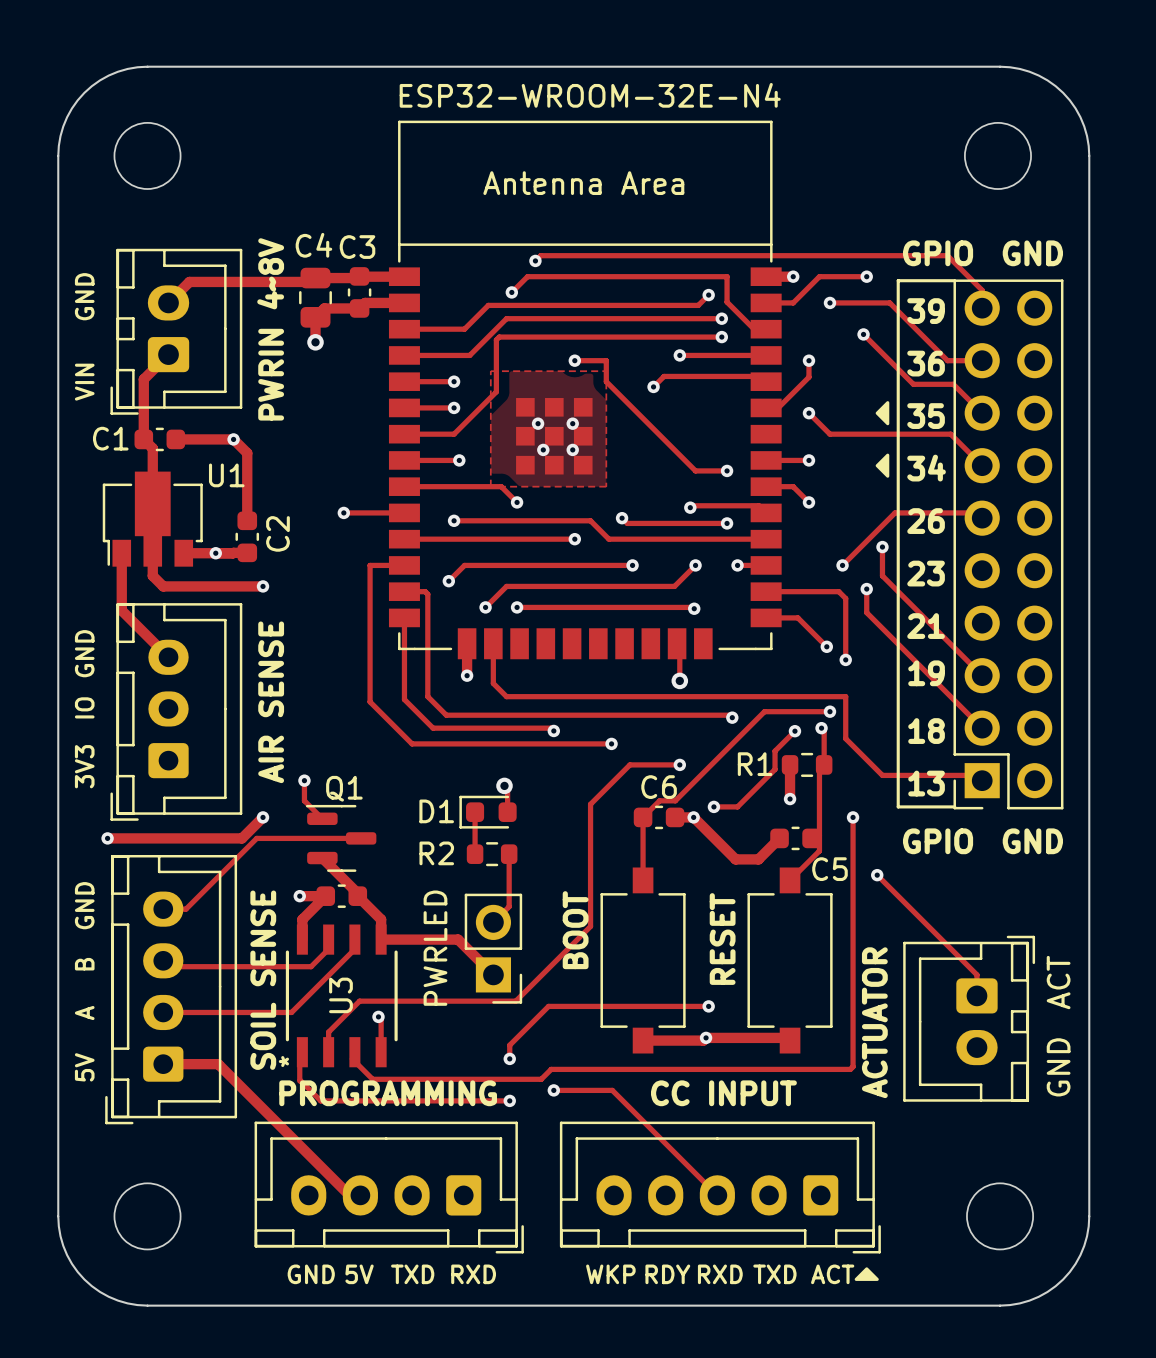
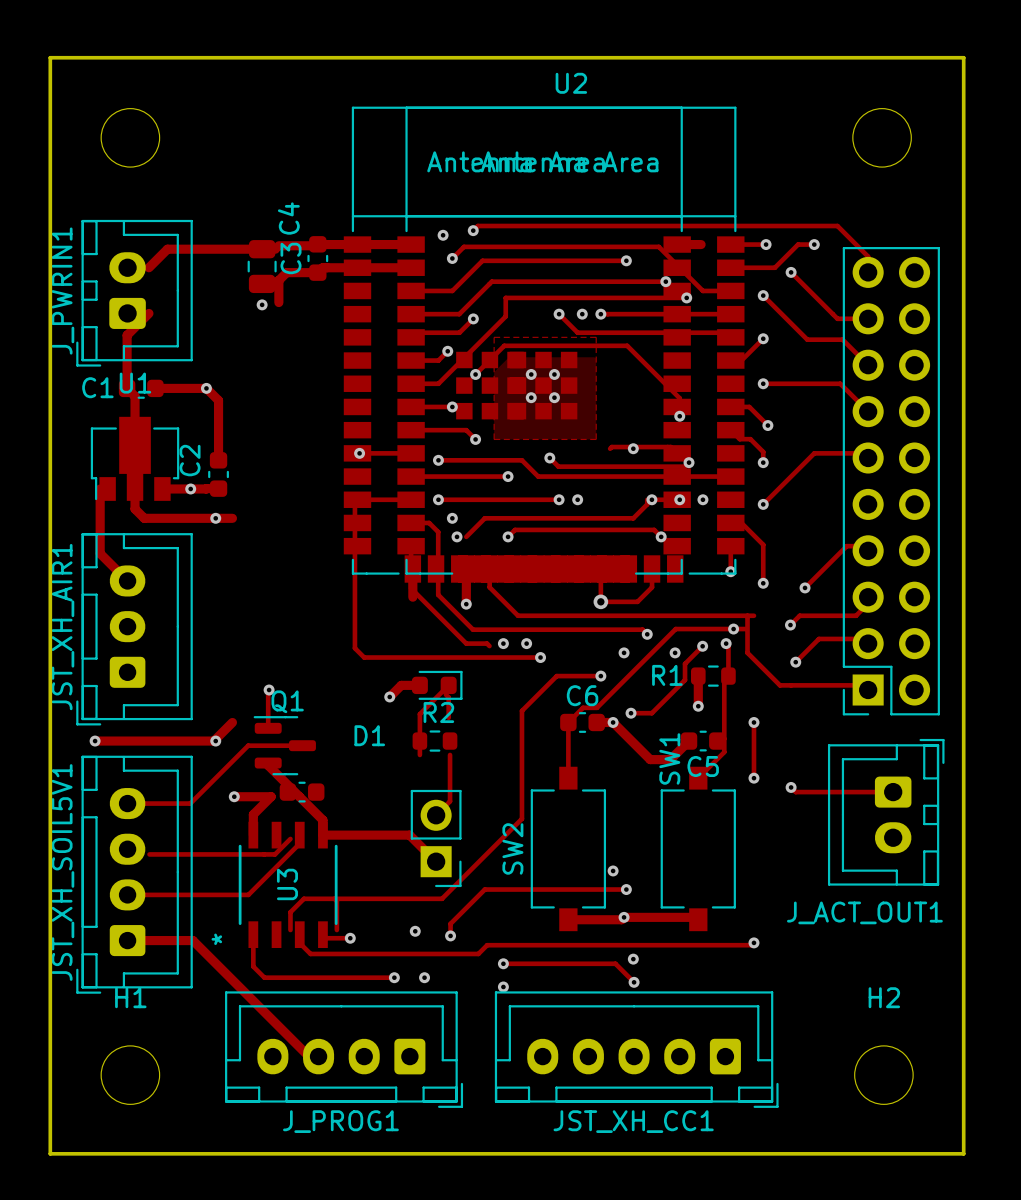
board edge: (147, 66) (1000, 66) (1019, 68) (1038, 75) (1055, 86) (1069, 100) (1084, 126) (1089, 155) (1089, 1216) (1087, 1236) (1080, 1255) (1069, 1272) (1055, 1286) (1029, 1300) (1000, 1305) (147, 1305) (127, 1303) (108, 1296) (91, 1286) (77, 1272) (63, 1245) (58, 1216) (58, 145) (67, 117) (77, 100) (91, 86) (118, 71) (147, 66) -> (50, 57) (50, 1153) (963, 1153) (963, 57) (50, 57)
text: ESP32-WROOM-32E-N4 (590, 95) -> none
C4 name rotation: 0° (313, 245) -> 90° counterclockwise (288, 218)
C3 name rotation: 0° (357, 247) -> 90° counterclockwise (291, 258)
C3 name position: C3 (357, 247) -> C3 (291, 258)
text: GPIO (938, 253) -> none
text: GND (1032, 253) -> none
via: none -> (443, 235)
via: (793, 276) -> none
track: (826, 276) (819, 276) (793, 302) (766, 302) -> none
via: none -> (814, 244)
track: (524, 279) (527, 276) (727, 276) (727, 302) (754, 329) -> (463, 246) (658, 246) (702, 290) (730, 290)
line: (954, 280) (898, 280) (898, 806) (954, 806) -> none
track: (708, 295) (698, 305) (488, 305) (464, 329) (404, 329) -> (626, 260) (482, 260) (452, 290) (411, 290)
text: GND (84, 296) -> none
C4 position: (315, 297) -> (262, 266)
via: (829, 302) -> none
track: (876, 302) (889, 302) (895, 308) -> (774, 267) (798, 244) (814, 244)
via: none -> (791, 272)
text: 39 (926, 311) -> none
track: (556, 318) (506, 318) (469, 355) -> (491, 281) (459, 314) (415, 314)
track: none -> (637, 281) (665, 281)
via: (721, 318) -> none
via: none -> (665, 281)
text: PWRIN 4~8V (270, 329) -> none
J_PWRIN1: none -> (134, 293)
part: (176, 331) -> none
track: (572, 337) (499, 337) (496, 340) (496, 391) (454, 434) (404, 434) -> (505, 297) (505, 316) (438, 383) (411, 383)
via: (721, 337) -> none
via: none -> (686, 297)
via: (315, 342) -> none
via: none -> (262, 304)
track: (404, 355) (465, 355) -> (357, 267) (411, 267)
via: none -> (559, 314)
via: none -> (582, 314)
track: none -> (473, 318) (459, 332) (415, 332) (411, 337)
via: none -> (473, 318)
track: (574, 360) (606, 360) (606, 381) (695, 470) (727, 470) -> none
via: (574, 360) -> none
track: (808, 360) (808, 377) (778, 407) -> none
via: (808, 360) -> none
text: 36 (926, 363) -> none
zone outline: (490, 371) (606, 371) (606, 486) (490, 486) (490, 371) -> (494, 337) (596, 337) (596, 439) (494, 439) (494, 337)
track: (664, 376) (653, 386) -> (586, 332) (577, 332) (559, 314)
track: none -> (672, 332) (726, 332) (730, 337)
track: (404, 381) (454, 381) -> none
via: (454, 381) -> none
text: VIN (84, 382) -> none
track: none -> (763, 338) (741, 360) (730, 360)
via: none -> (763, 338)
via: (653, 386) -> none
U2: none -> (570, 344)
track: none -> (447, 351) (438, 360) (411, 360)
via: none -> (447, 351)
drawing: [875, 401, 890, 426] -> none
track: (404, 407) (454, 407) -> none
via: (454, 407) -> none
track: (808, 413) (829, 434) (863, 434) -> none
via: (808, 413) -> none
text: 35 (926, 416) -> none
track: none -> (475, 374) (504, 345) (627, 345) (679, 398) (679, 416)
via: (572, 423) -> none
via: none -> (531, 374)
via: none -> (554, 374)
via: none -> (763, 383)
via: (543, 449) -> none
via: (572, 449) -> none
via: none -> (531, 397)
via: none -> (554, 397)
drawing: [875, 453, 890, 478] -> none
track: (404, 460) (459, 460) -> (637, 297) (686, 297)
via: (459, 460) -> none
track: none -> (411, 406) (452, 406)
via: none -> (452, 406)
track: (766, 460) (808, 460) -> none
via: (808, 460) -> none
track: none -> (730, 406) (749, 406) (767, 425)
text: 34 (926, 468) -> none
via: (727, 470) -> none
via: none -> (679, 416)
U1 name position: U1 (226, 475) -> U1 (135, 383)
via: none -> (767, 425)
track: (404, 486) (465, 486) -> (357, 244) (411, 244)
track: (501, 486) (517, 502) -> (443, 430) (466, 430) (475, 439)
track: (766, 486) (793, 486) (808, 502) -> none
track: none -> (730, 430) (739, 439) (750, 439) (763, 451) (763, 462)
via: none -> (475, 439)
via: (517, 502) -> none
via: (808, 502) -> none
via: (690, 507) -> none
via: none -> (633, 448)
track: (343, 512) (404, 512) -> none
via: (343, 512) -> none
track: none -> (359, 453) (411, 453)
via: none -> (359, 453)
track: (921, 512) (895, 512) (842, 565) -> (814, 453) (763, 504)
track: (454, 520) (496, 520) -> none
via: (454, 520) -> none
via: none -> (438, 460)
text: 26 (926, 521) -> none
track: (627, 523) (727, 523) -> (554, 462) (558, 466) (685, 466) (689, 462)
via: (727, 523) -> none
via: none -> (689, 462)
via: none -> (763, 462)
C2 name position: C2 (277, 533) -> C2 (190, 460)
track: (404, 539) (465, 539) -> (677, 314) (730, 314)
track: (882, 547) (882, 575) (982, 675) -> none
via: (882, 547) -> none
track: none -> (100, 488) (100, 553) (127, 580)
track: (121, 553) (121, 610) (168, 657) -> none
track: (401, 565) (370, 565) (370, 701) (401, 733) -> (354, 499) (354, 648)
track: (464, 565) (448, 581) -> (410, 499) (357, 499)
track: (465, 565) (496, 565) -> none
via: none -> (438, 499)
via: none -> (577, 499)
track: (695, 565) (674, 586) -> (647, 499) (647, 504) (633, 518) (596, 518)
via: (695, 565) -> none
via: none -> (679, 499)
via: none -> (702, 499)
via: (842, 565) -> none
via: none -> (763, 504)
text: 23 (926, 573) -> none
via: (448, 581) -> none
via position: (263, 586) -> (215, 518)
via: none -> (452, 518)
track: (548, 586) (506, 586) (485, 607) -> (484, 518) (466, 536)
track: (866, 589) (866, 612) (976, 722) -> none
via: (866, 589) -> none
track: (404, 591) (425, 591) (427, 594) (427, 696) (446, 715) (729, 715) -> (411, 522) (429, 522) (438, 532) (438, 594) (473, 629) (642, 629) (645, 632)
track: (766, 591) (826, 591) -> (677, 476) (730, 476)
track: (845, 598) (845, 659) -> (747, 529) (763, 544) (763, 583)
via: (485, 607) -> none
track: (517, 607) (694, 608) -> none
track: none -> (508, 536) (515, 529) (654, 529) (661, 536)
via: none -> (508, 536)
via: none -> (661, 536)
via: (694, 608) -> none
track: (404, 617) (404, 699) (433, 728) (527, 728) -> (411, 546) (411, 588) (466, 643)
track: (766, 617) (797, 617) (826, 646) -> (730, 546) (730, 571)
track: none -> (879, 546) (846, 546) (805, 587)
text: 21 (926, 626) -> none
track: (493, 643) (493, 683) (506, 696) (586, 696) -> (489, 569) (489, 587) (518, 615)
track: none -> (466, 569) (466, 604)
track: none -> (652, 569) (652, 587) (637, 601) (605, 601)
text: GND (84, 653) -> none
via position: (845, 659) -> (763, 583)
via: none -> (805, 587)
track: none -> (879, 592) (856, 615) (799, 615) (790, 625)
text: 19 (926, 673) -> none
via: (467, 675) -> none
via: none -> (466, 604)
text: AIR SENSE (271, 702) -> none
text: IO (84, 707) -> none
via: none -> (790, 625)
JST_XH_AIR1: none -> (134, 629)
part: (176, 711) -> none
track: none -> (733, 629) (744, 629)
track: none -> (879, 638) (818, 638) (795, 662)
via: none -> (526, 643)
via position: (553, 730) -> (503, 643)
text: 18 (926, 731) -> none
via: none -> (624, 652)
via: none -> (675, 652)
via: none -> (795, 662)
text: 3V3 (84, 766) -> none
track: none -> (419, 685) (401, 685) (389, 696)
track: none -> (448, 685) (419, 714) (419, 717)
track: (304, 780) (304, 800) (322, 818) -> (269, 690) (268, 728)
text: 13 (926, 783) -> none
via: (504, 785) -> none
via: none -> (389, 696)
D1 name position: D1 (436, 811) -> D1 (369, 735)
D1 rotation: 0° (488, 812) -> 180° (437, 685)
D1 position: (488, 812) -> (437, 685)
via position: (263, 817) -> (215, 741)
Q1 position: (341, 838) -> (284, 745)
track: (361, 838) (256, 838) (186, 909) -> (302, 745) (248, 745) (190, 803) (164, 803)
text: GPIO (938, 841) -> none
text: GND (1032, 841) -> none
R2 name position: R2 (436, 853) -> R2 (438, 712)
R2 position: (492, 854) -> (434, 741)
track: (322, 858) (357, 893) -> none
SW1 name: none -> SW1 (669, 758)
C5 name position: C5 (829, 869) -> C5 (703, 766)
track: (877, 875) (976, 974) (976, 995) -> none
via: (877, 875) -> none
track: (853, 880) (853, 1066) -> none
via: none -> (753, 778)
track: none -> (791, 787) (795, 792) (893, 792)
via: none -> (791, 787)
track: (299, 896) (325, 896) (302, 919) (302, 939) -> none
via position: (299, 896) -> (234, 796)
track: (357, 896) (381, 919) (381, 939) (458, 939) (463, 944) -> (268, 763) (268, 765) (322, 820) (322, 835) (409, 835)
track: none -> (234, 796) (271, 796) (253, 814) (253, 835)
text: GND (84, 905) -> none
J_ACT_OUT1: none -> (886, 812)
text: BOOT (575, 930) -> none
text: RESET (722, 939) -> none
text: PWRLED (435, 948) -> none
track: (354, 949) (291, 1012) (281, 1012) -> (299, 835) (299, 843) (248, 894)
SW2 name: none -> SW2 (512, 848)
text: B (84, 964) -> none
text: SOIL SENSE (263, 980) -> none
text: ACT (1058, 982) -> none
via: none -> (613, 870)
JST_XH_SOIL5V1 name: none -> JST_XH_SOIL5V1 (62, 872)
JST_XH_SOIL5V1 position: (171, 989) -> (134, 874)
U3 position: (341, 995) -> (288, 884)
track: (515, 1001) (359, 1001) (343, 1016) -> (455, 884) (442, 898) (303, 898)
text: A (84, 1013) -> none
via position: (378, 1016) -> (350, 938)
part: (969, 1018) -> none
text: ACTUATOR (874, 1022) -> none
via: none -> (415, 931)
track: none -> (253, 934) (253, 966) (264, 977) (394, 977)
track: none -> (322, 934) (326, 938) (350, 938)
track: (352, 1058) (372, 1079) -> (299, 934) (299, 943) (310, 953) (329, 953)
track: (299, 1060) (299, 1081) -> none
U3 text position: * (283, 1061) -> * (216, 939)
via: none -> (753, 942)
text: 5V (84, 1067) -> none
text: GND (1058, 1067) -> none
track: (300, 1080) (320, 1100) (509, 1100) -> none
via: none -> (633, 959)
track: (553, 1090) (569, 1090) -> none
via: (553, 1090) -> none
via: none -> (503, 963)
track: (612, 1090) (717, 1195) -> (541, 963) (615, 963) (634, 982)
text: PROGRAMMING (388, 1093) -> none
text: CC INPUT (723, 1093) -> none
via position: (509, 1100) -> (424, 977)
via: none -> (394, 977)
via: none -> (634, 982)
via: none -> (503, 986)
H1 name: none -> H1 (130, 997)
H2 name: none -> H2 (884, 997)
drawing: [854, 1267, 879, 1281] -> none
J_PROG1 name: none -> J_PROG1 (340, 1121)
JST_XH_CC1 name: none -> JST_XH_CC1 (633, 1121)
text: GND (311, 1274) -> none
text: 5V (359, 1274) -> none
text: TXD (412, 1274) -> none
text: RXD (473, 1274) -> none
text: WKP (610, 1274) -> none
text: RDY (667, 1274) -> none
text: RXD (720, 1274) -> none
text: TXD (774, 1274) -> none
text: ACT (832, 1274) -> none

